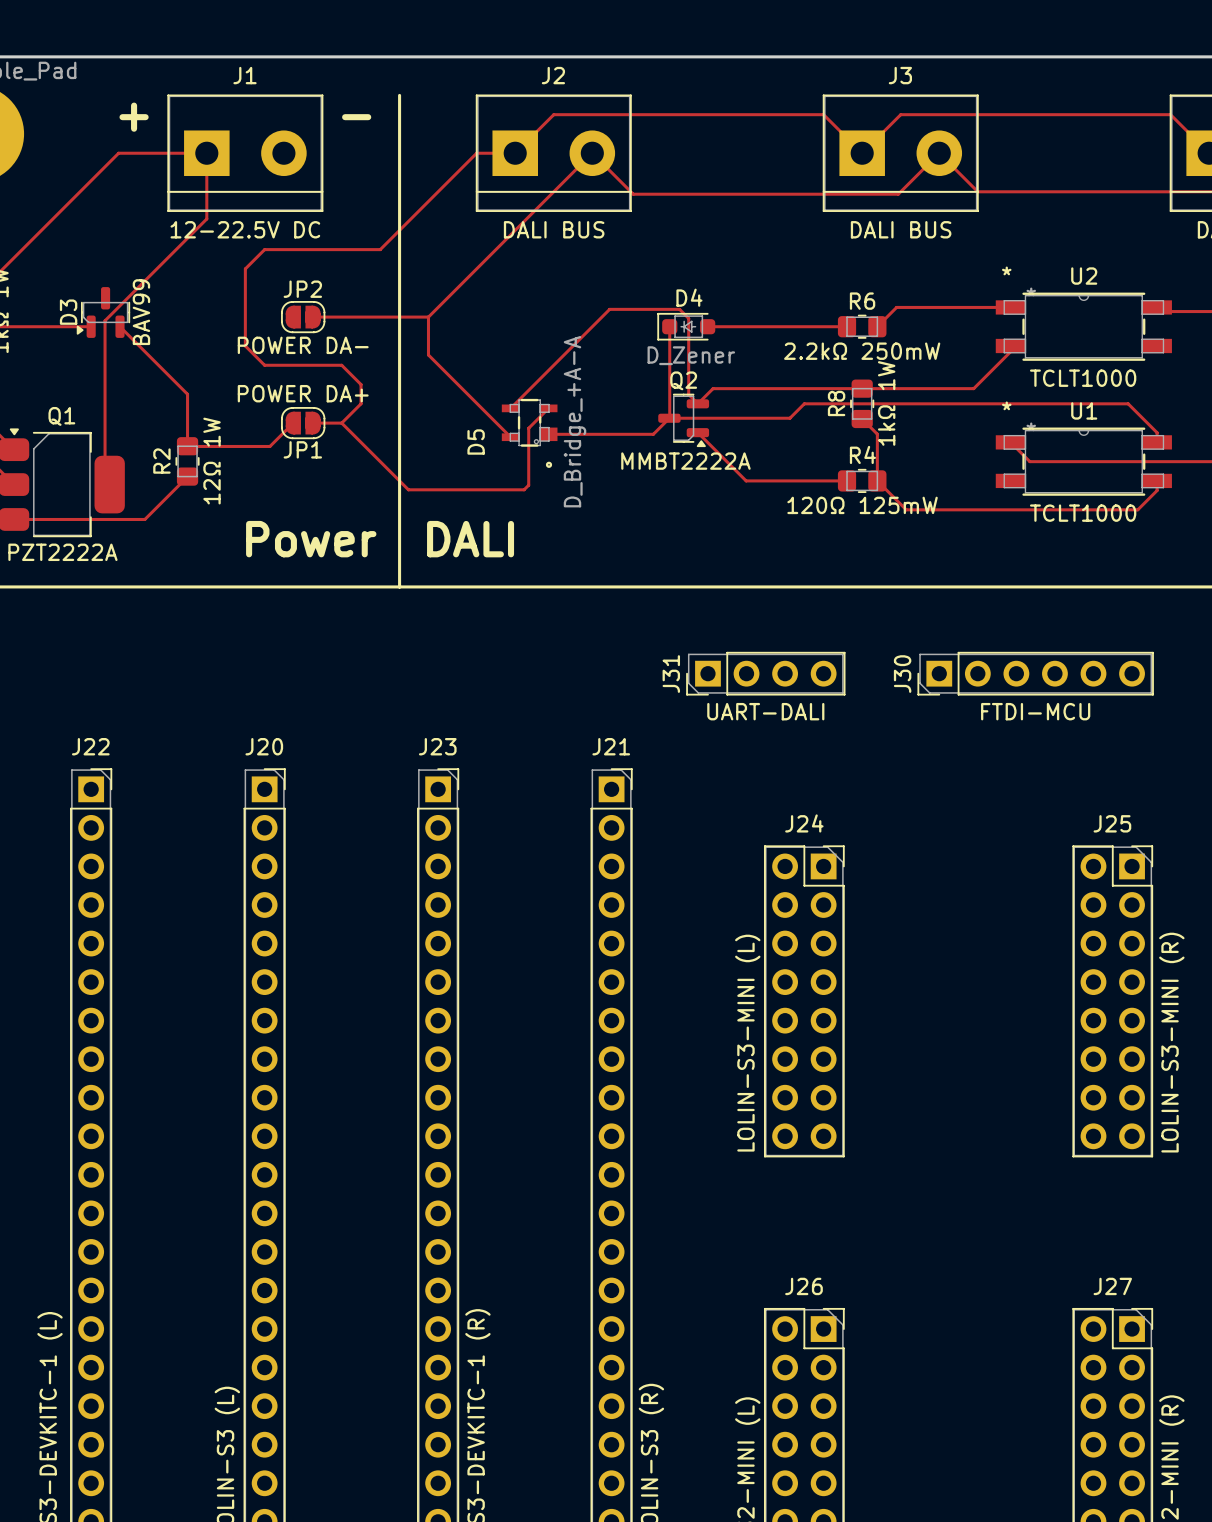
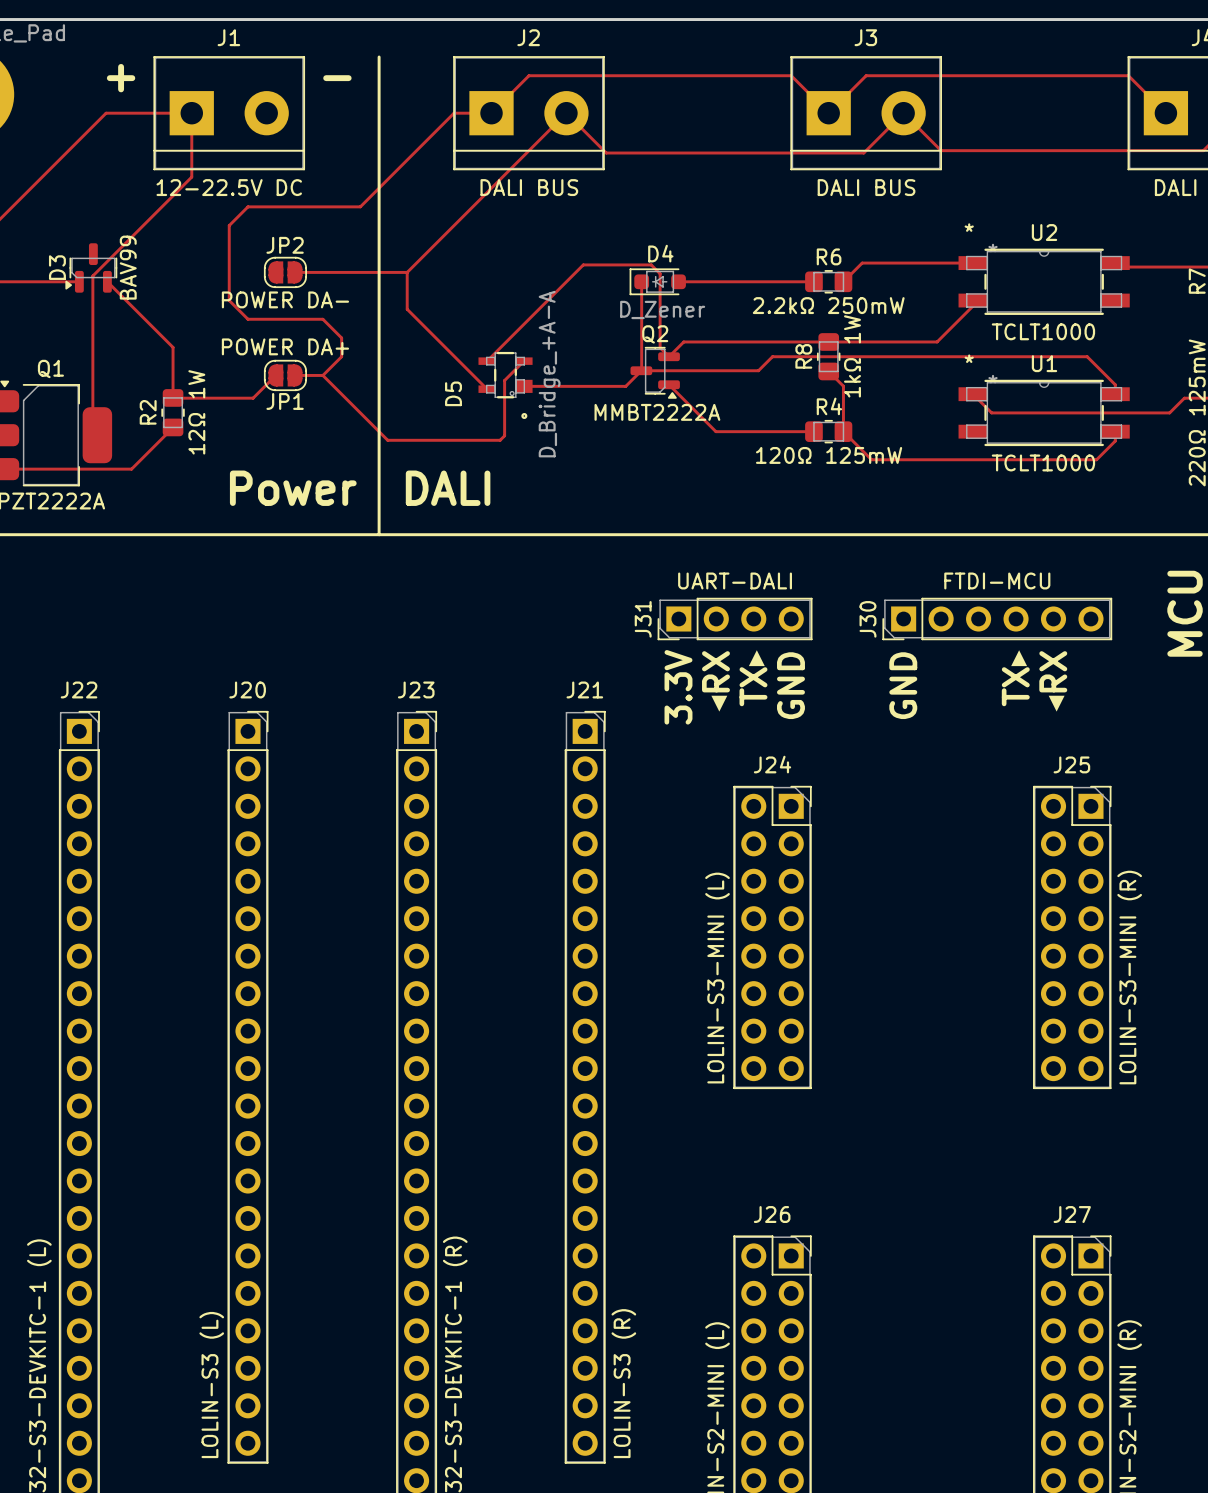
J31 value position: UART-DALI (765, 711) -> UART-DALI (735, 580)
J30 value position: FTDI-MCU (1035, 711) -> FTDI-MCU (997, 580)
text: none -> TX▸ (753, 677)
text: none -> TX▸ (1015, 677)
text: none -> ◂RX (715, 682)
text: none -> ◂RX (1053, 682)
text: none -> GND (790, 685)
text: none -> GND (903, 685)
text: none -> 3.3V (678, 687)

